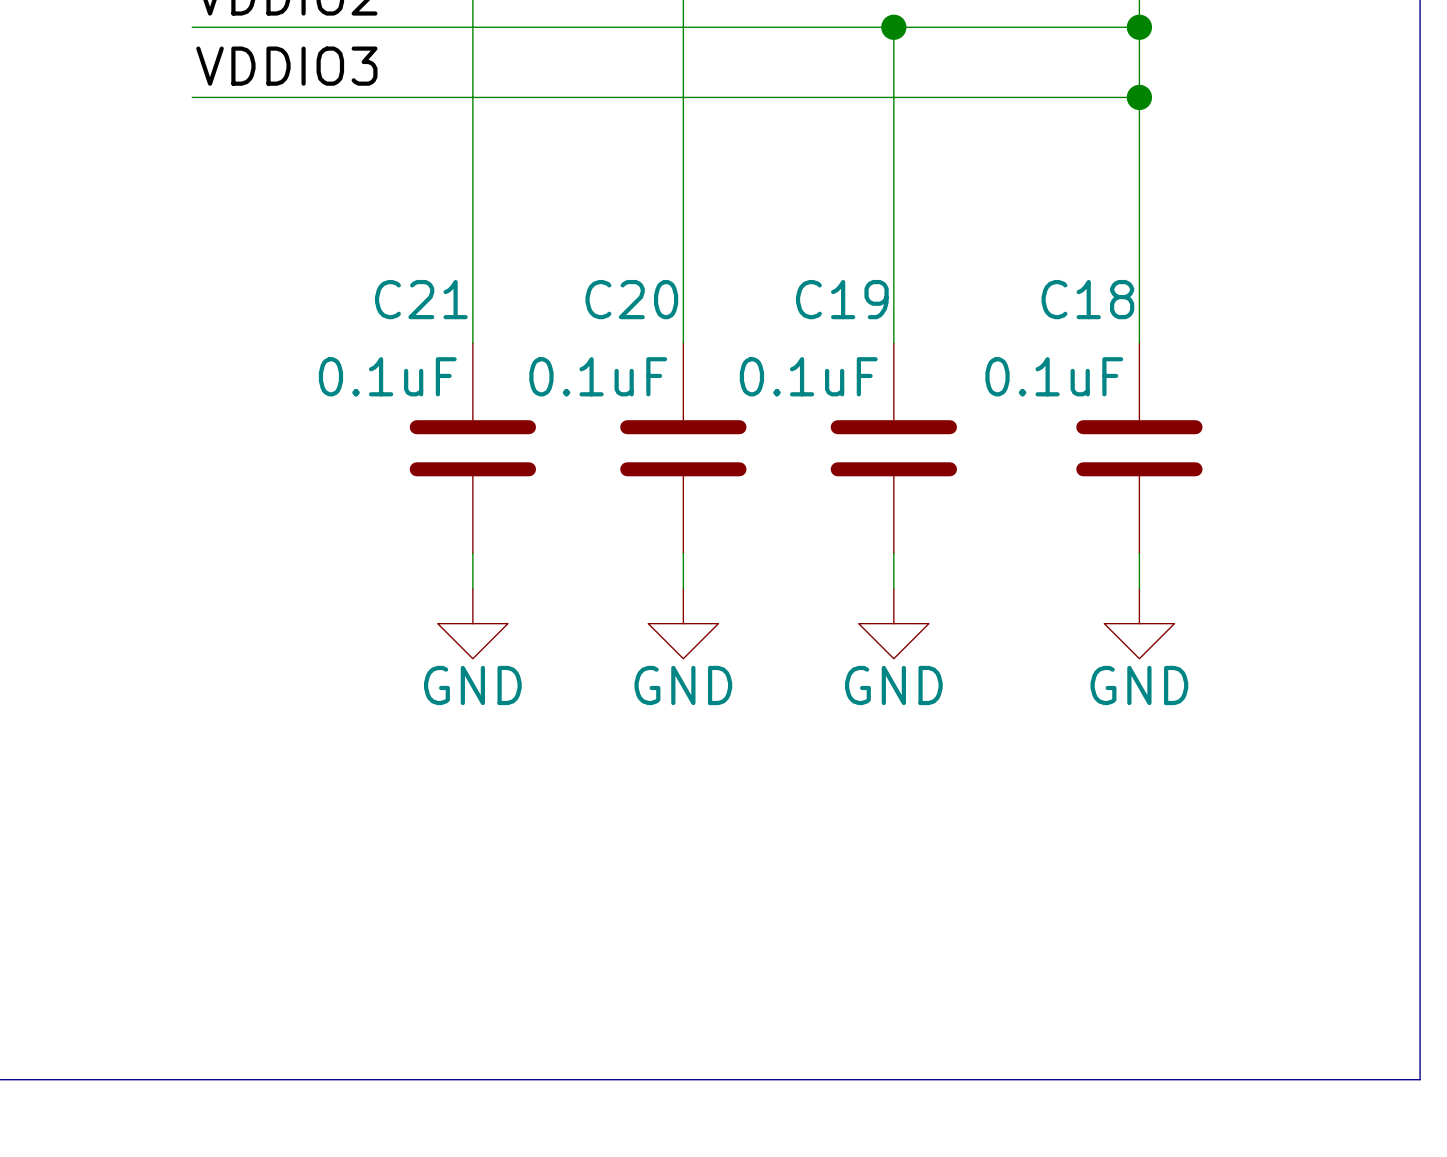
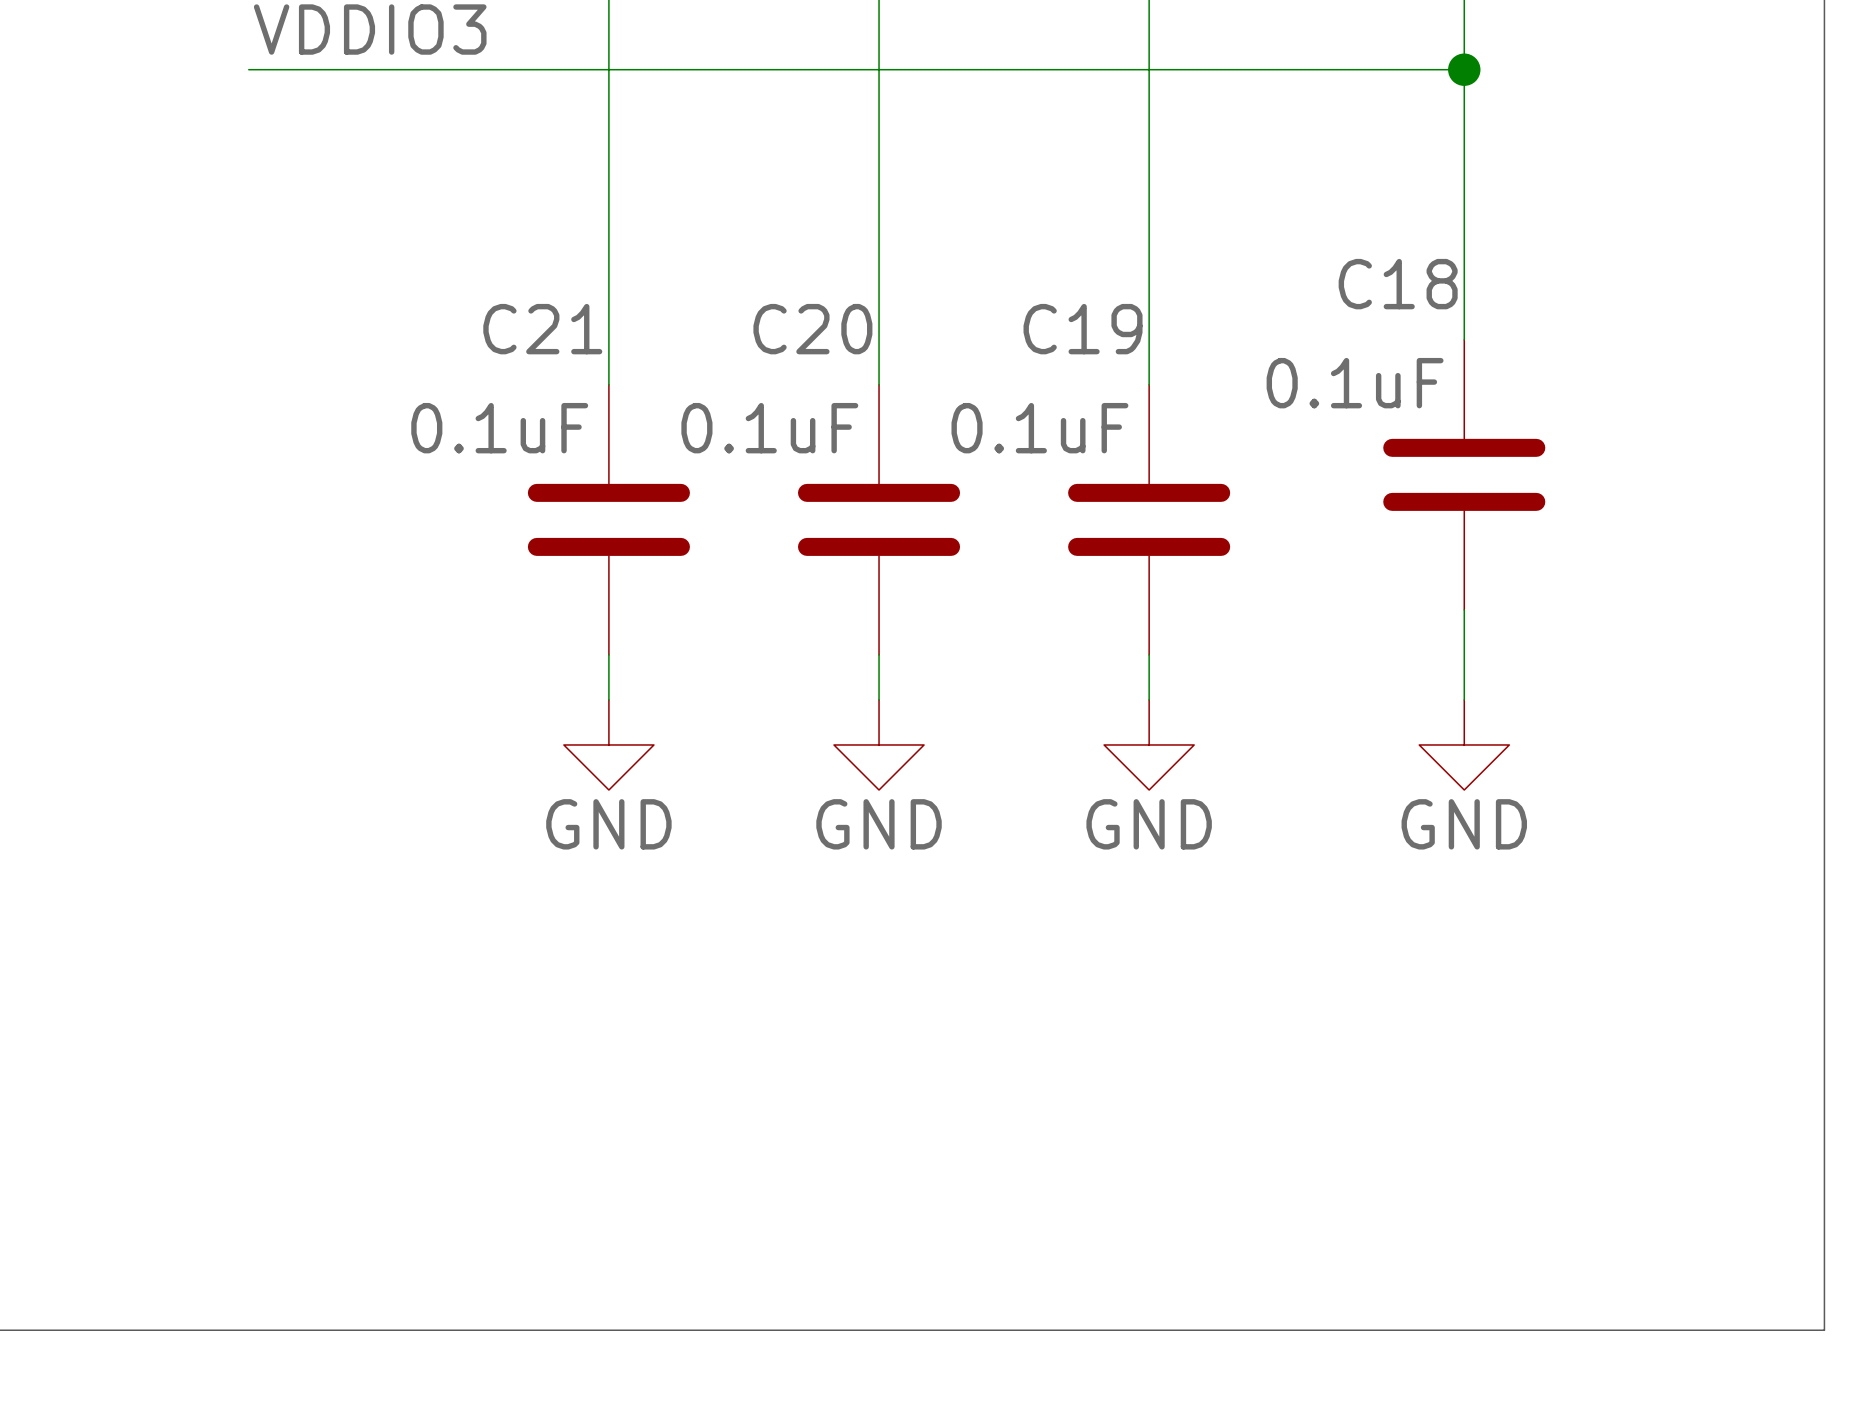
C18 position: (1139, 448) -> (1464, 474)

